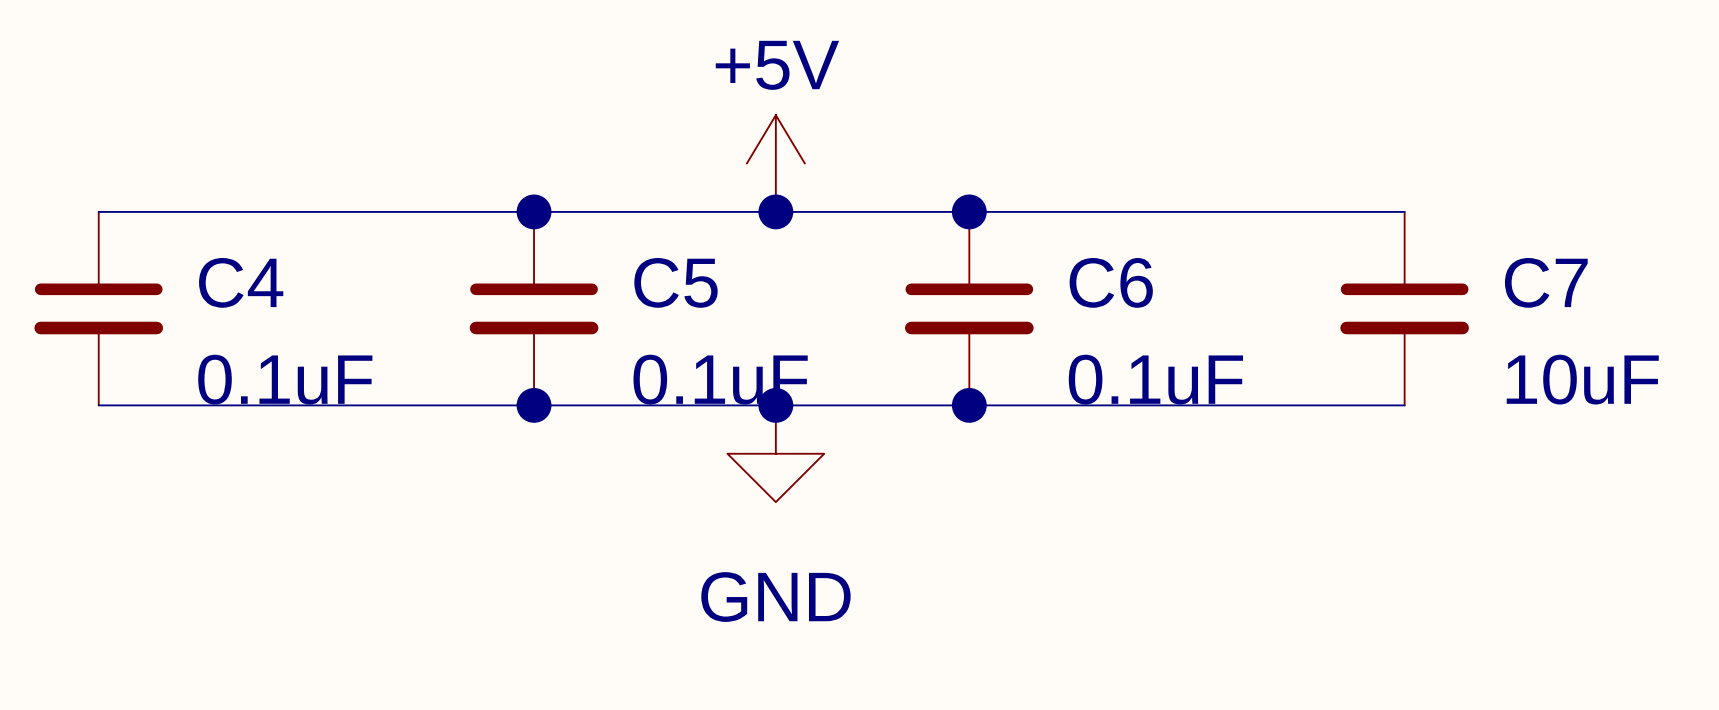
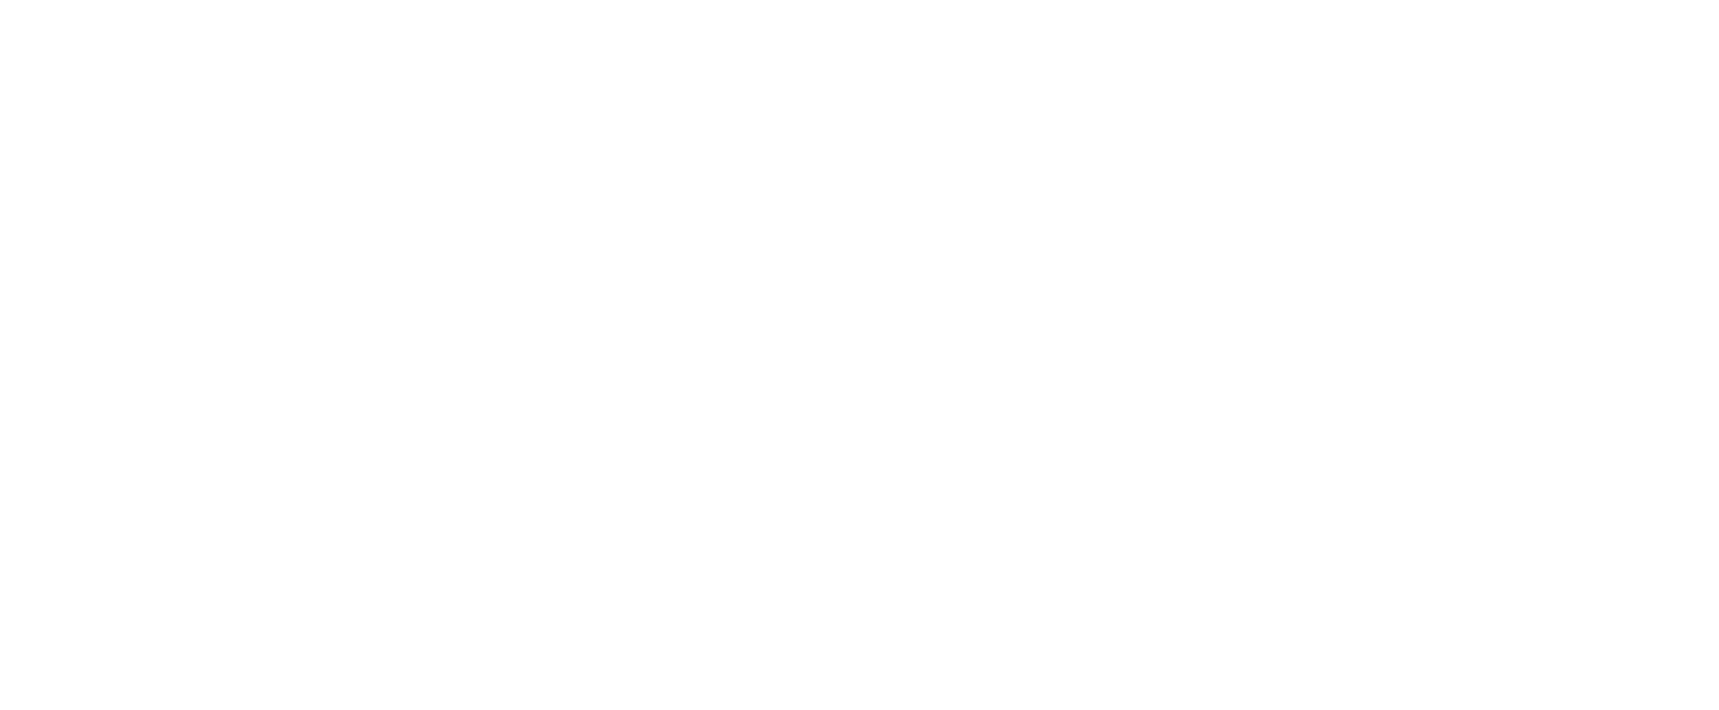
power symbol: +5V (775, 163) -> none
wire: (98, 211) (1404, 211) -> none
junction: (534, 211) -> none
junction: (775, 211) -> none
junction: (969, 211) -> none
C4: 0.1uF (98, 308) -> none
C5: 0.1uF (534, 308) -> none
C6: 0.1uF (969, 308) -> none
C7: 10uF (1404, 308) -> none
wire: (98, 405) (1404, 405) -> none
junction: (534, 405) -> none
junction: (775, 405) -> none
junction: (969, 405) -> none
power symbol: GND (775, 453) -> none

